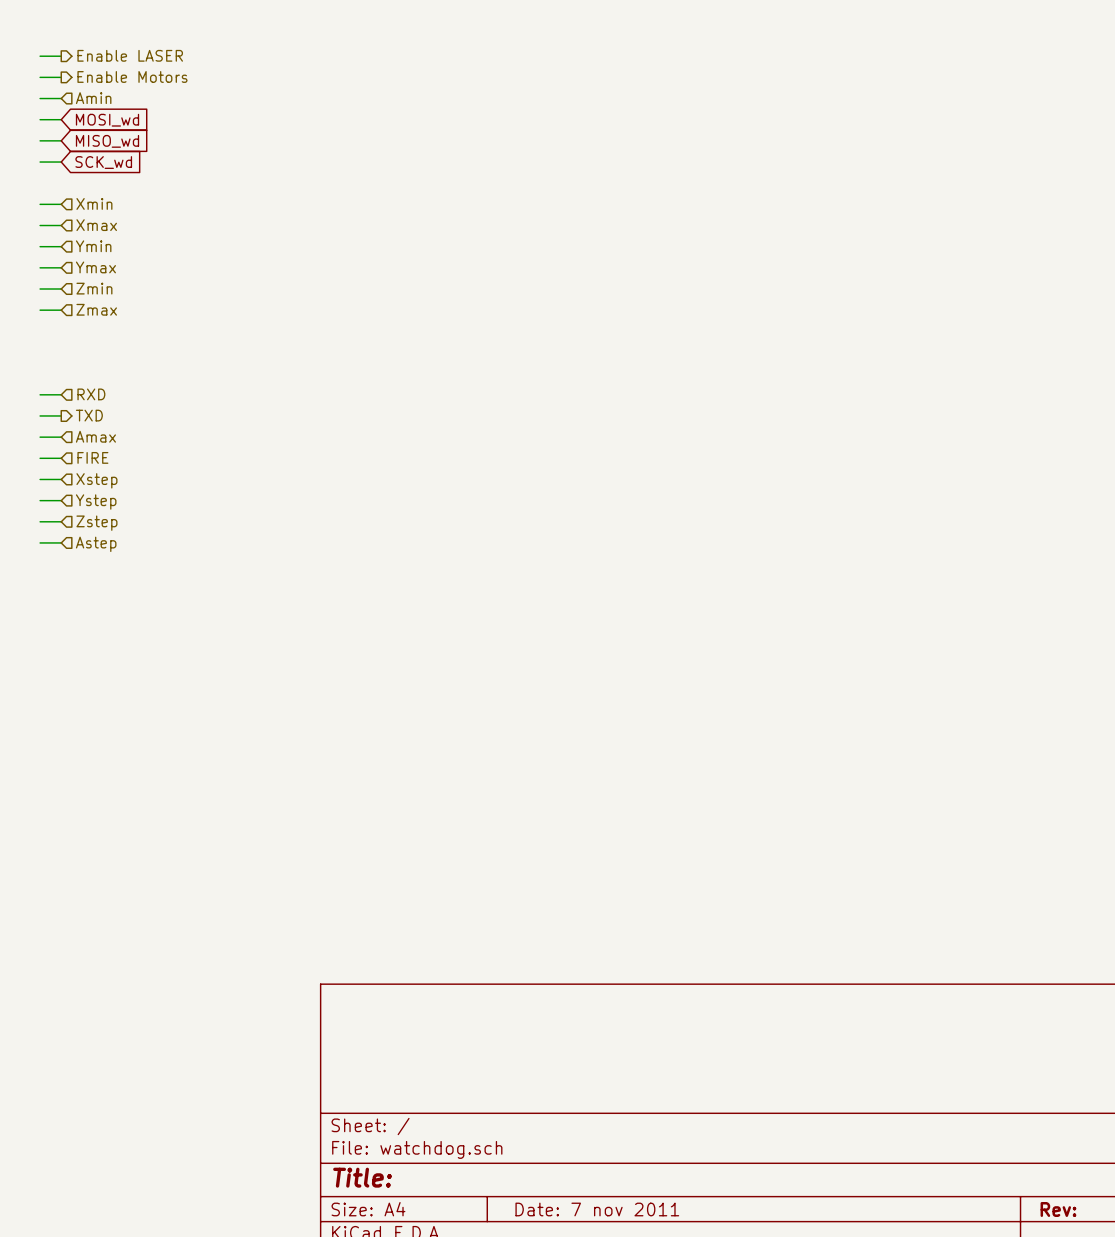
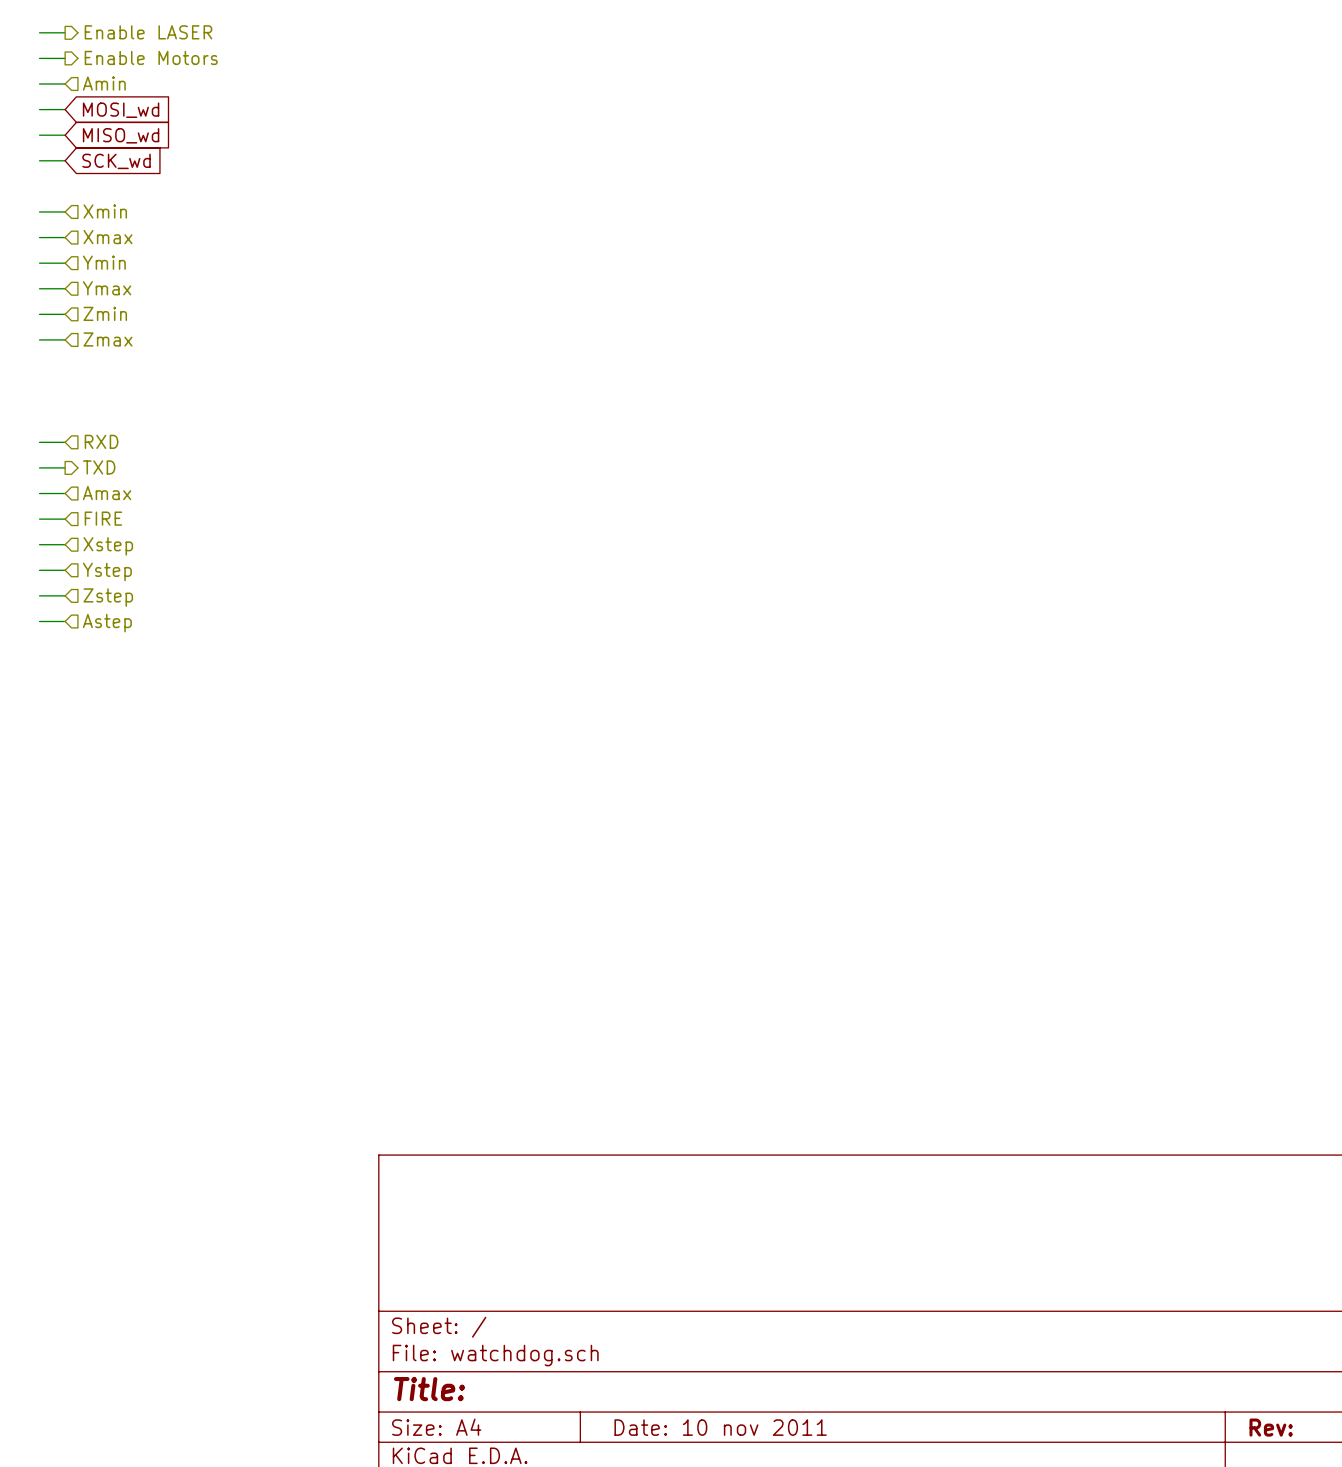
title block: Date: 7 nov 2011 (597, 1209) -> Date: 10 nov 2011 (720, 1427)

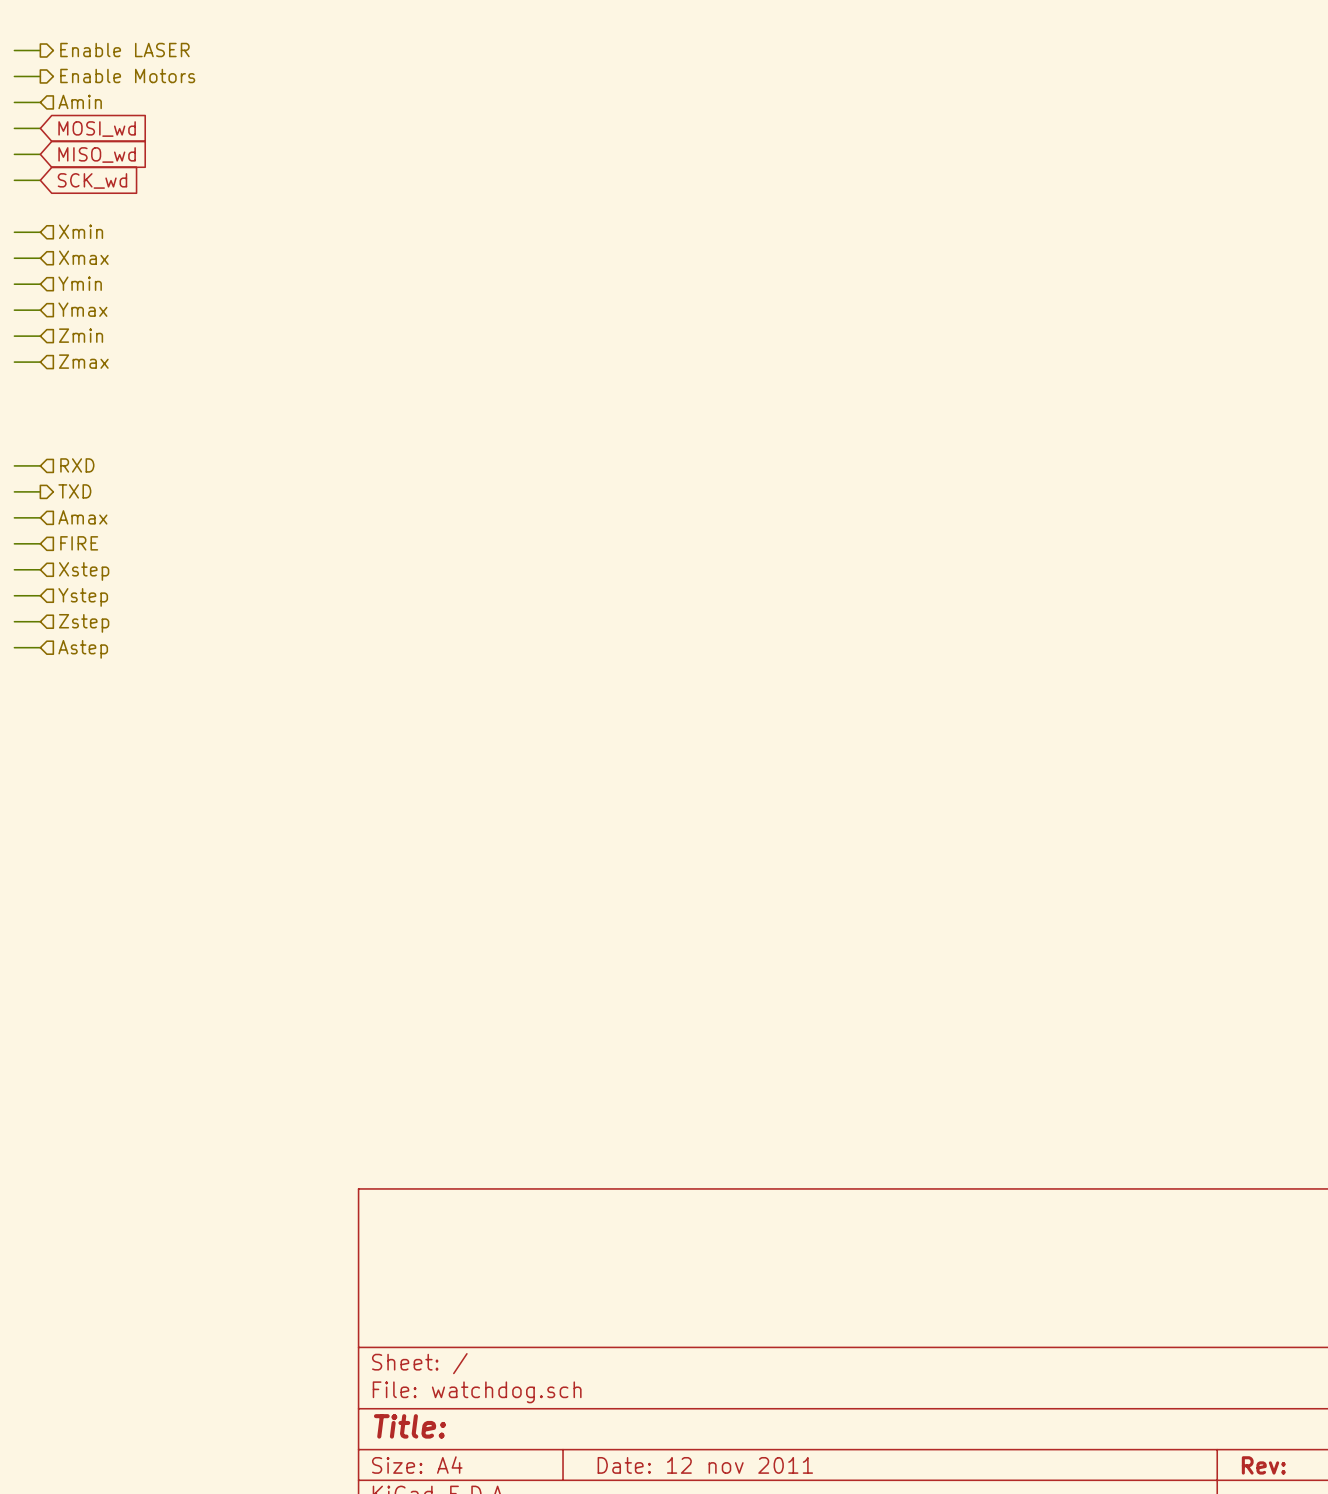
title block: Date: 10 nov 2011 (720, 1427) -> Date: 12 nov 2011 (705, 1465)

